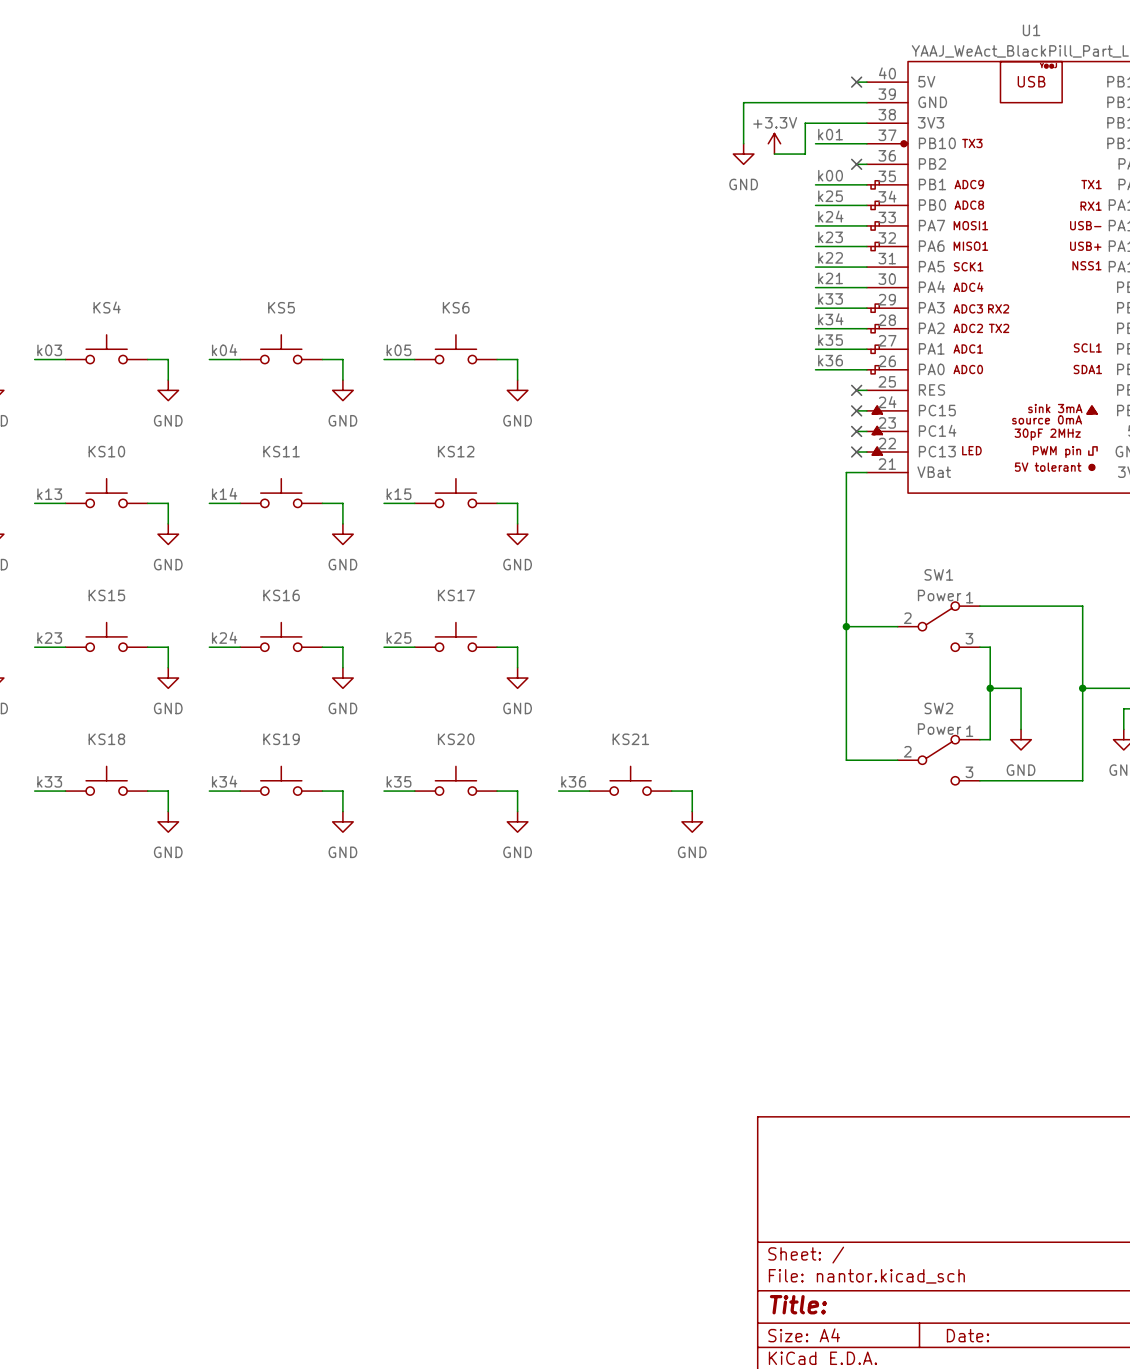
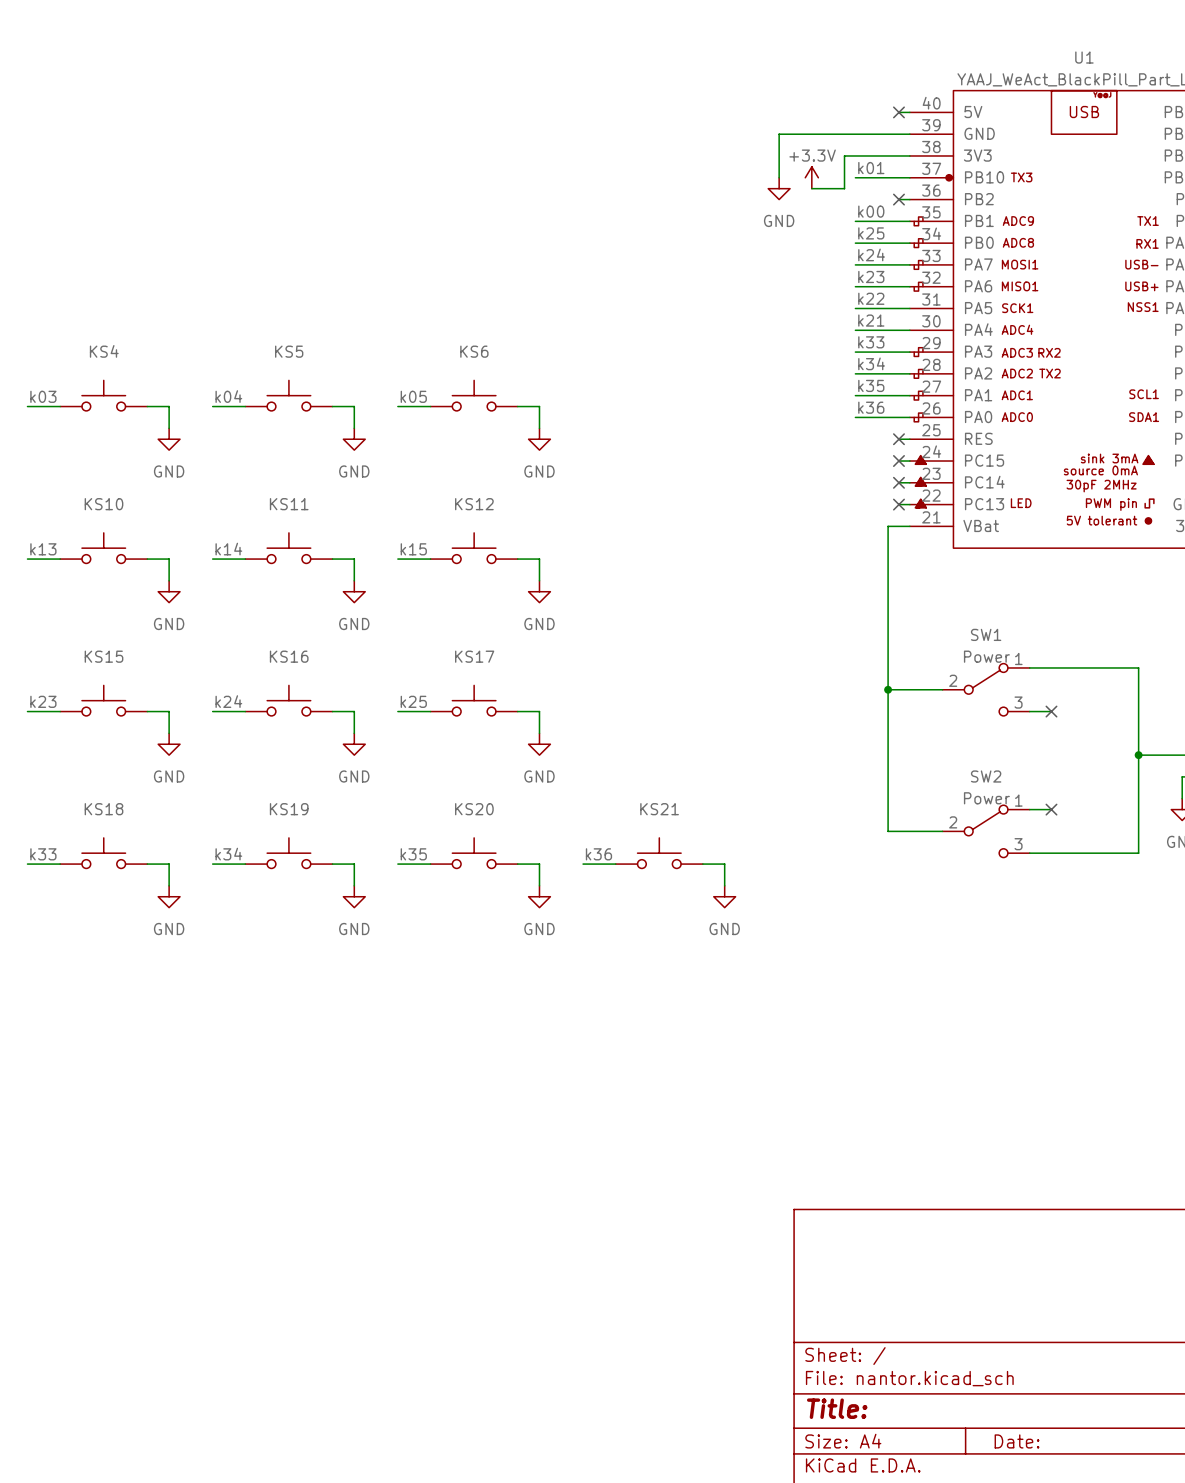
wire: (990, 647) (990, 739) -> (1040, 711) (1051, 711)
no-connect mark: none -> (1051, 711)
wire: (990, 688) (1021, 688) (1021, 729) -> none
junction: (990, 688) -> none
wire: none -> (1040, 809) (1051, 809)
no-connect mark: none -> (1051, 809)
power symbol: GND (1021, 739) -> none

